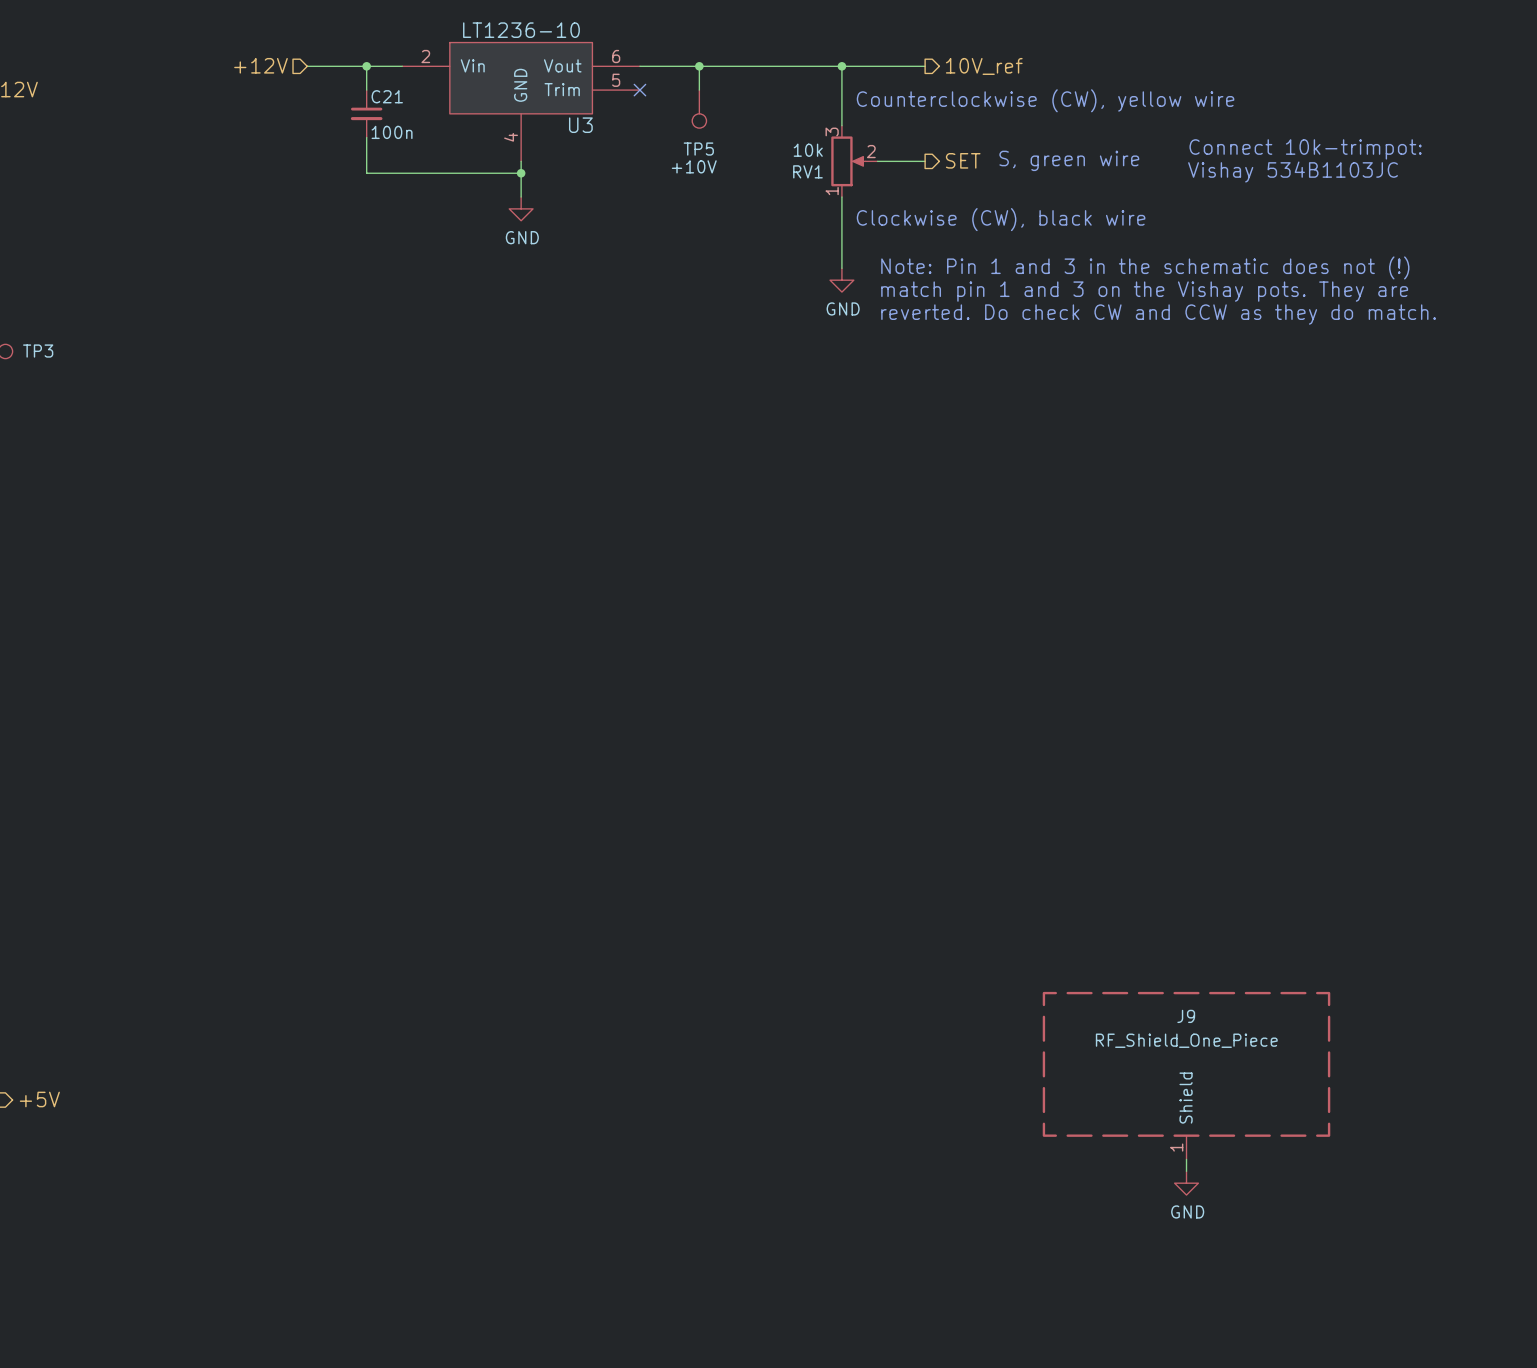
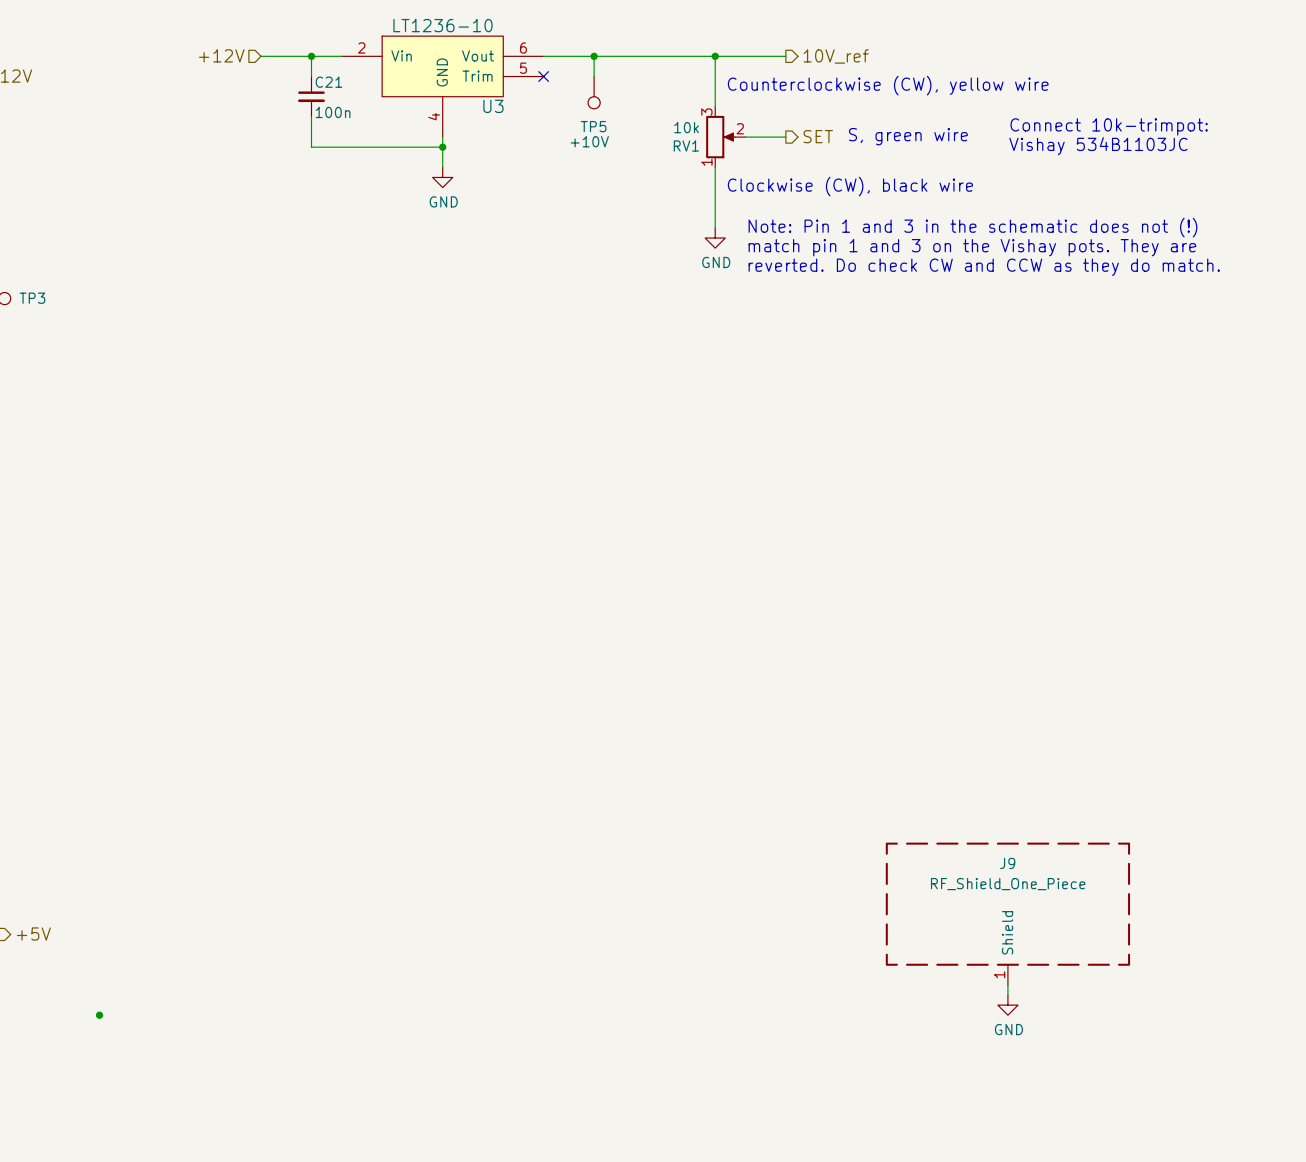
junction: none -> (99, 1015)

